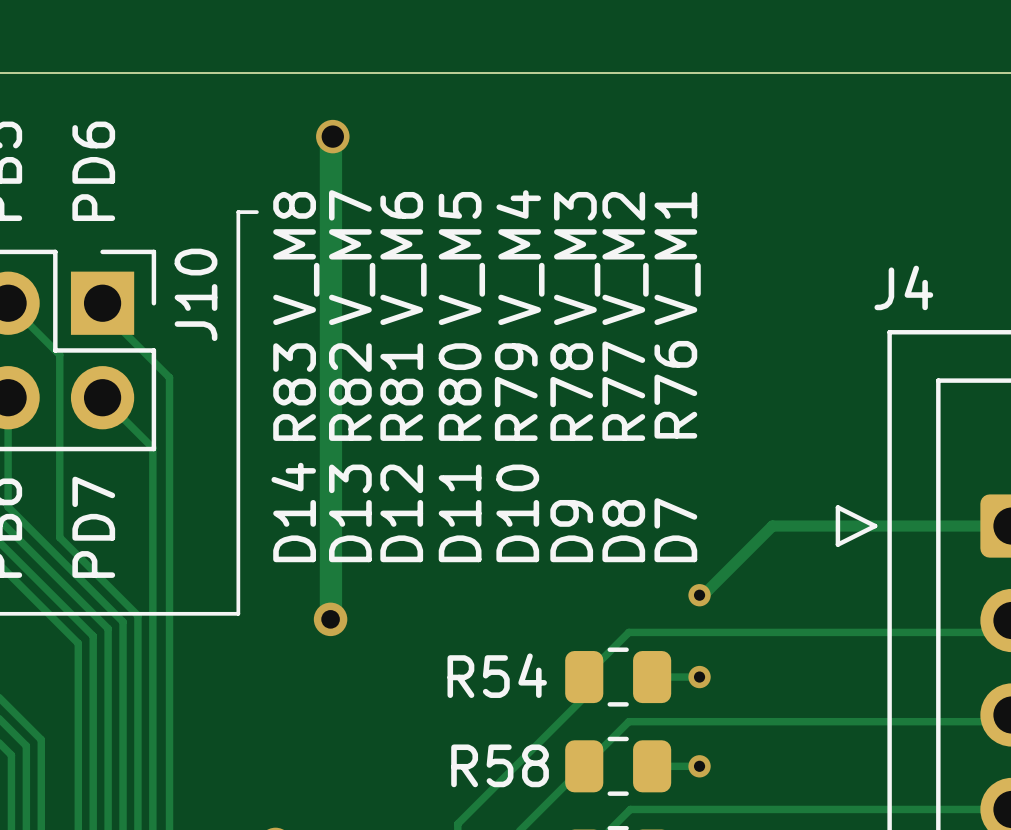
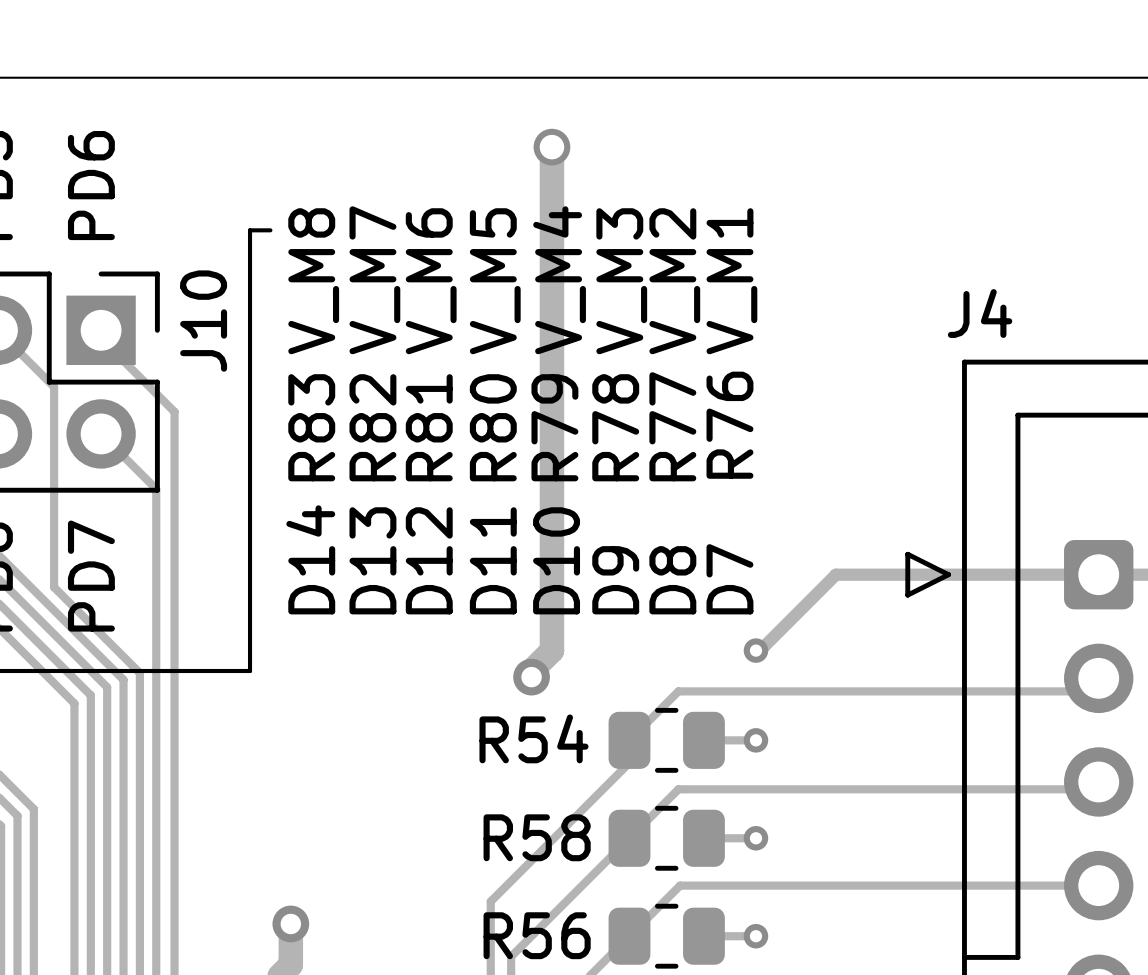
track: (332, 136) (330, 138) (330, 618) -> none
via position: (332, 136) -> (551, 147)
track: none -> (551, 147) (551, 650) (531, 671) (531, 677)
via position: (330, 619) -> (531, 677)

